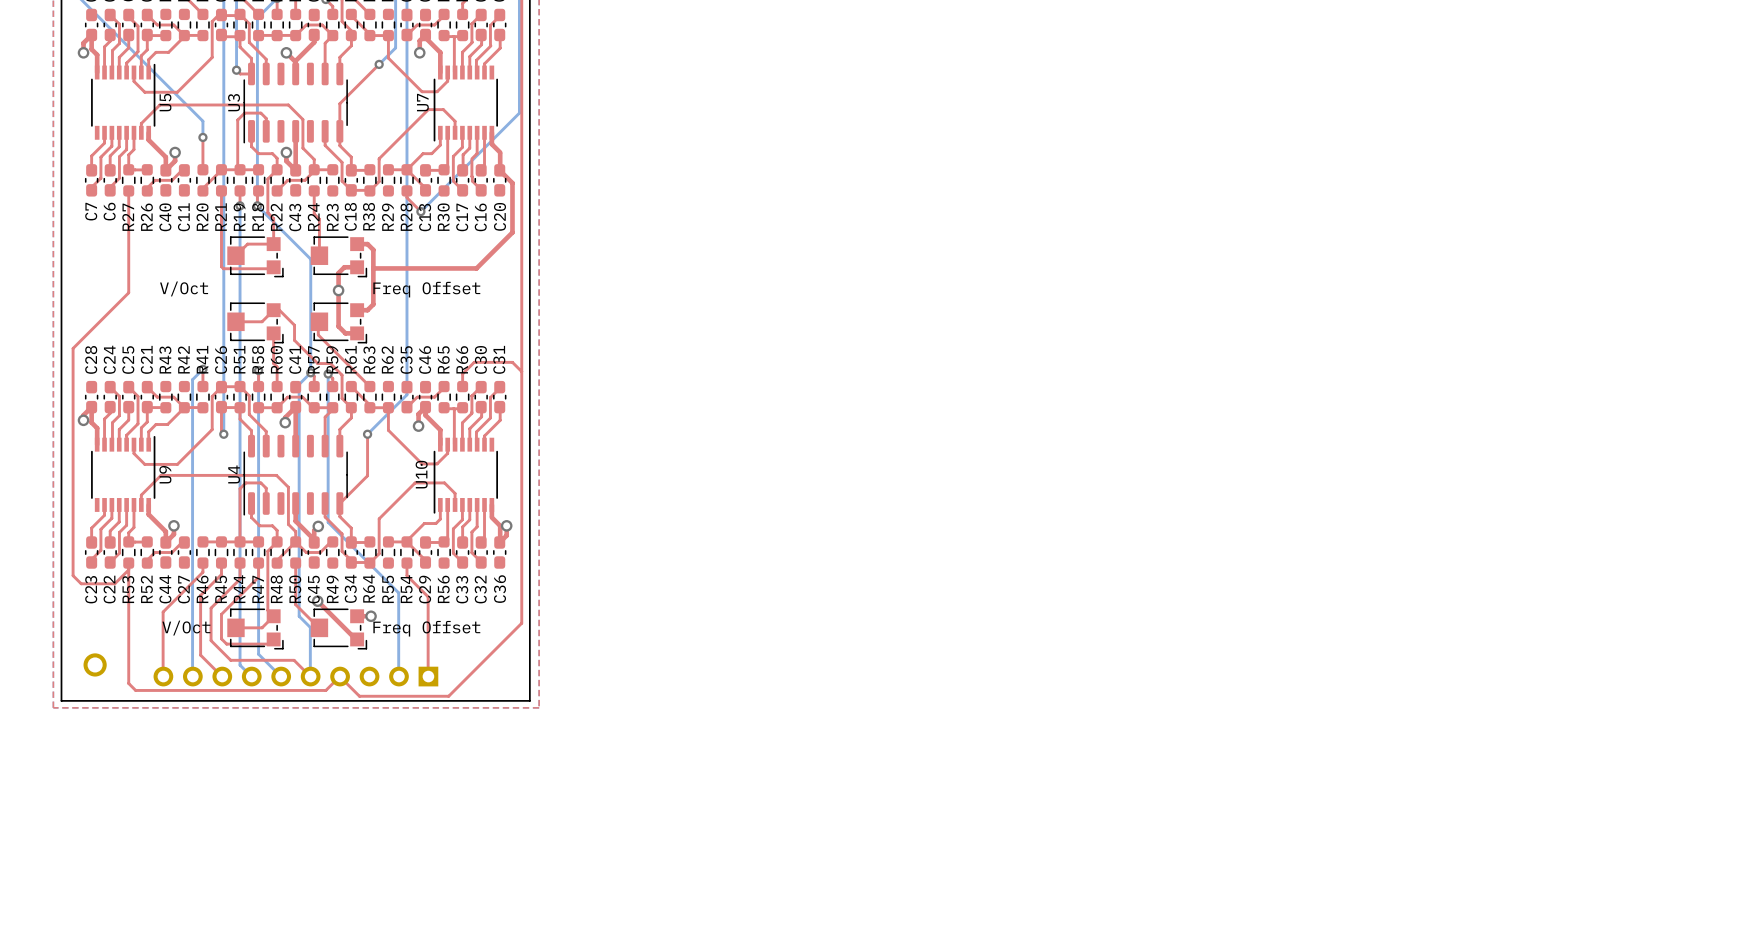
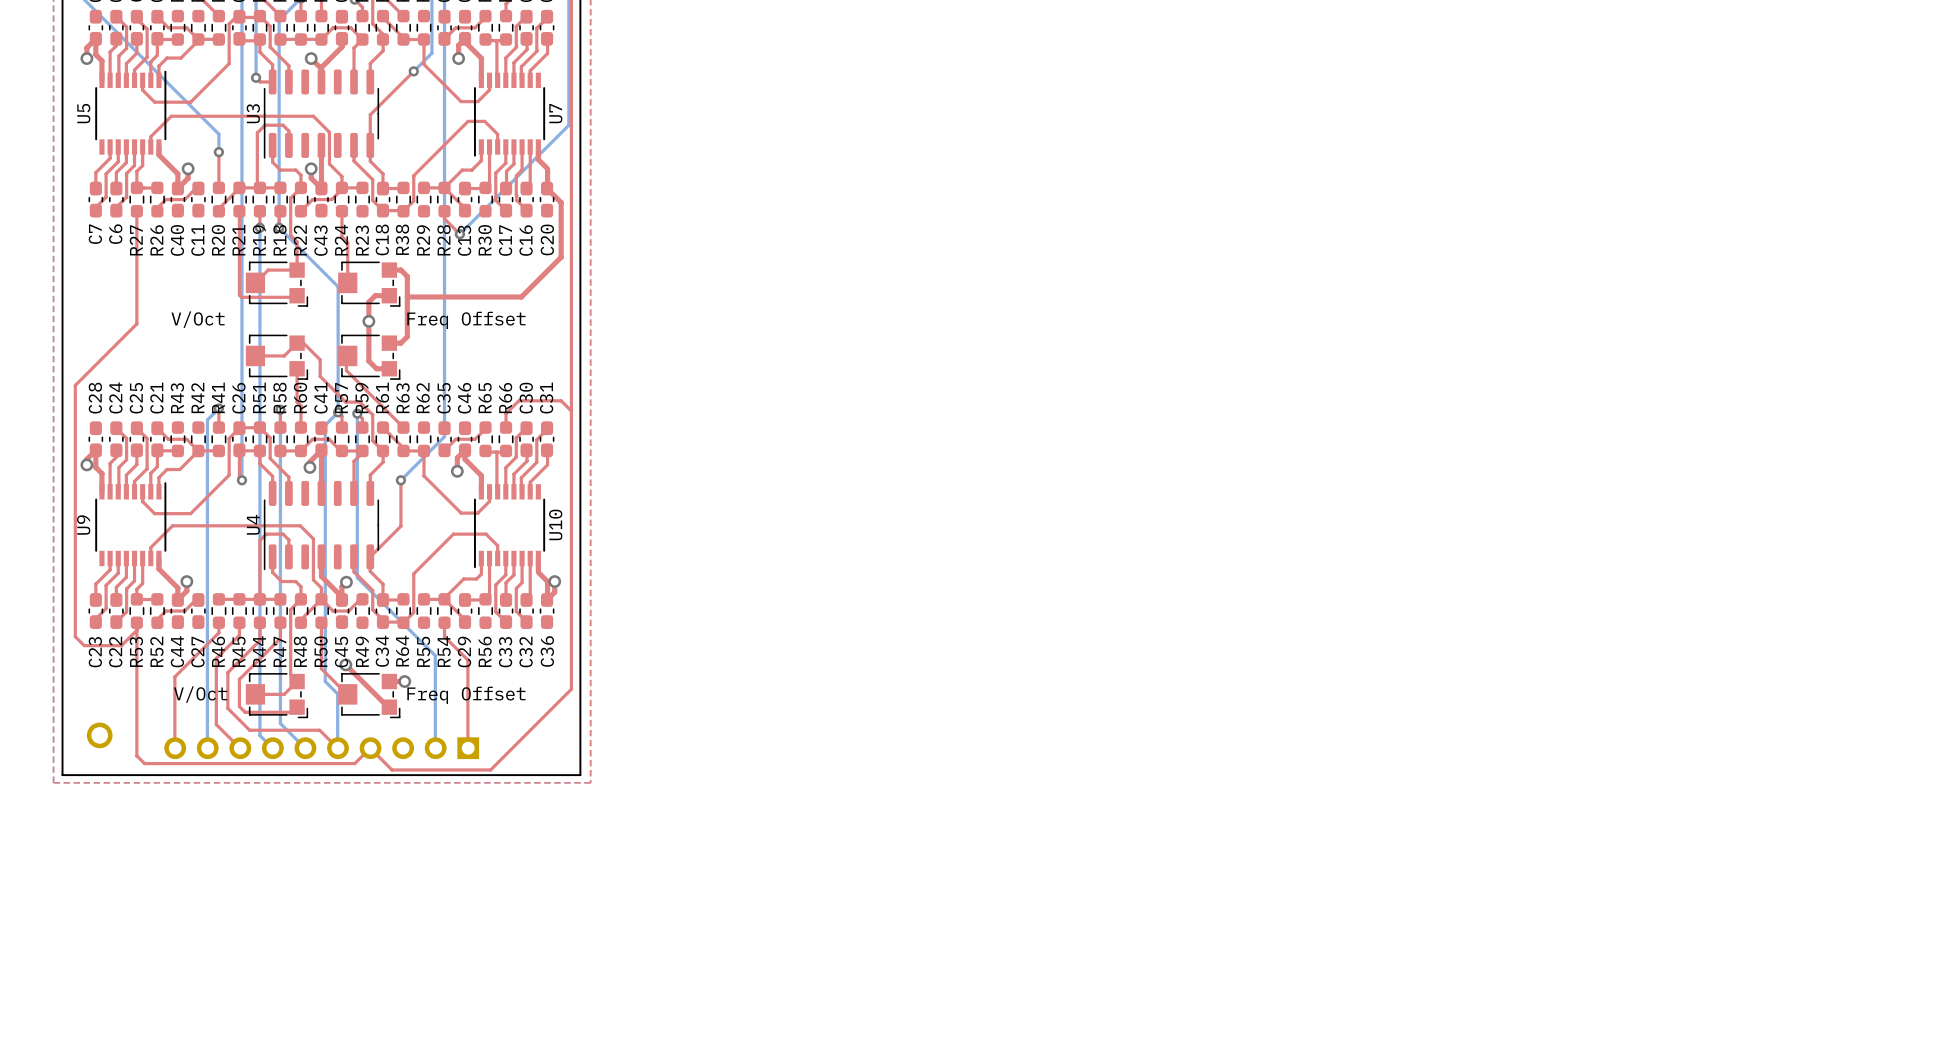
U5 name position: U5 (165, 102) -> U5 (83, 113)
U7 name position: U7 (422, 102) -> U7 (555, 113)
U9 name position: U9 (165, 474) -> U9 (83, 525)
U10 name position: U10 (421, 474) -> U10 (555, 524)

